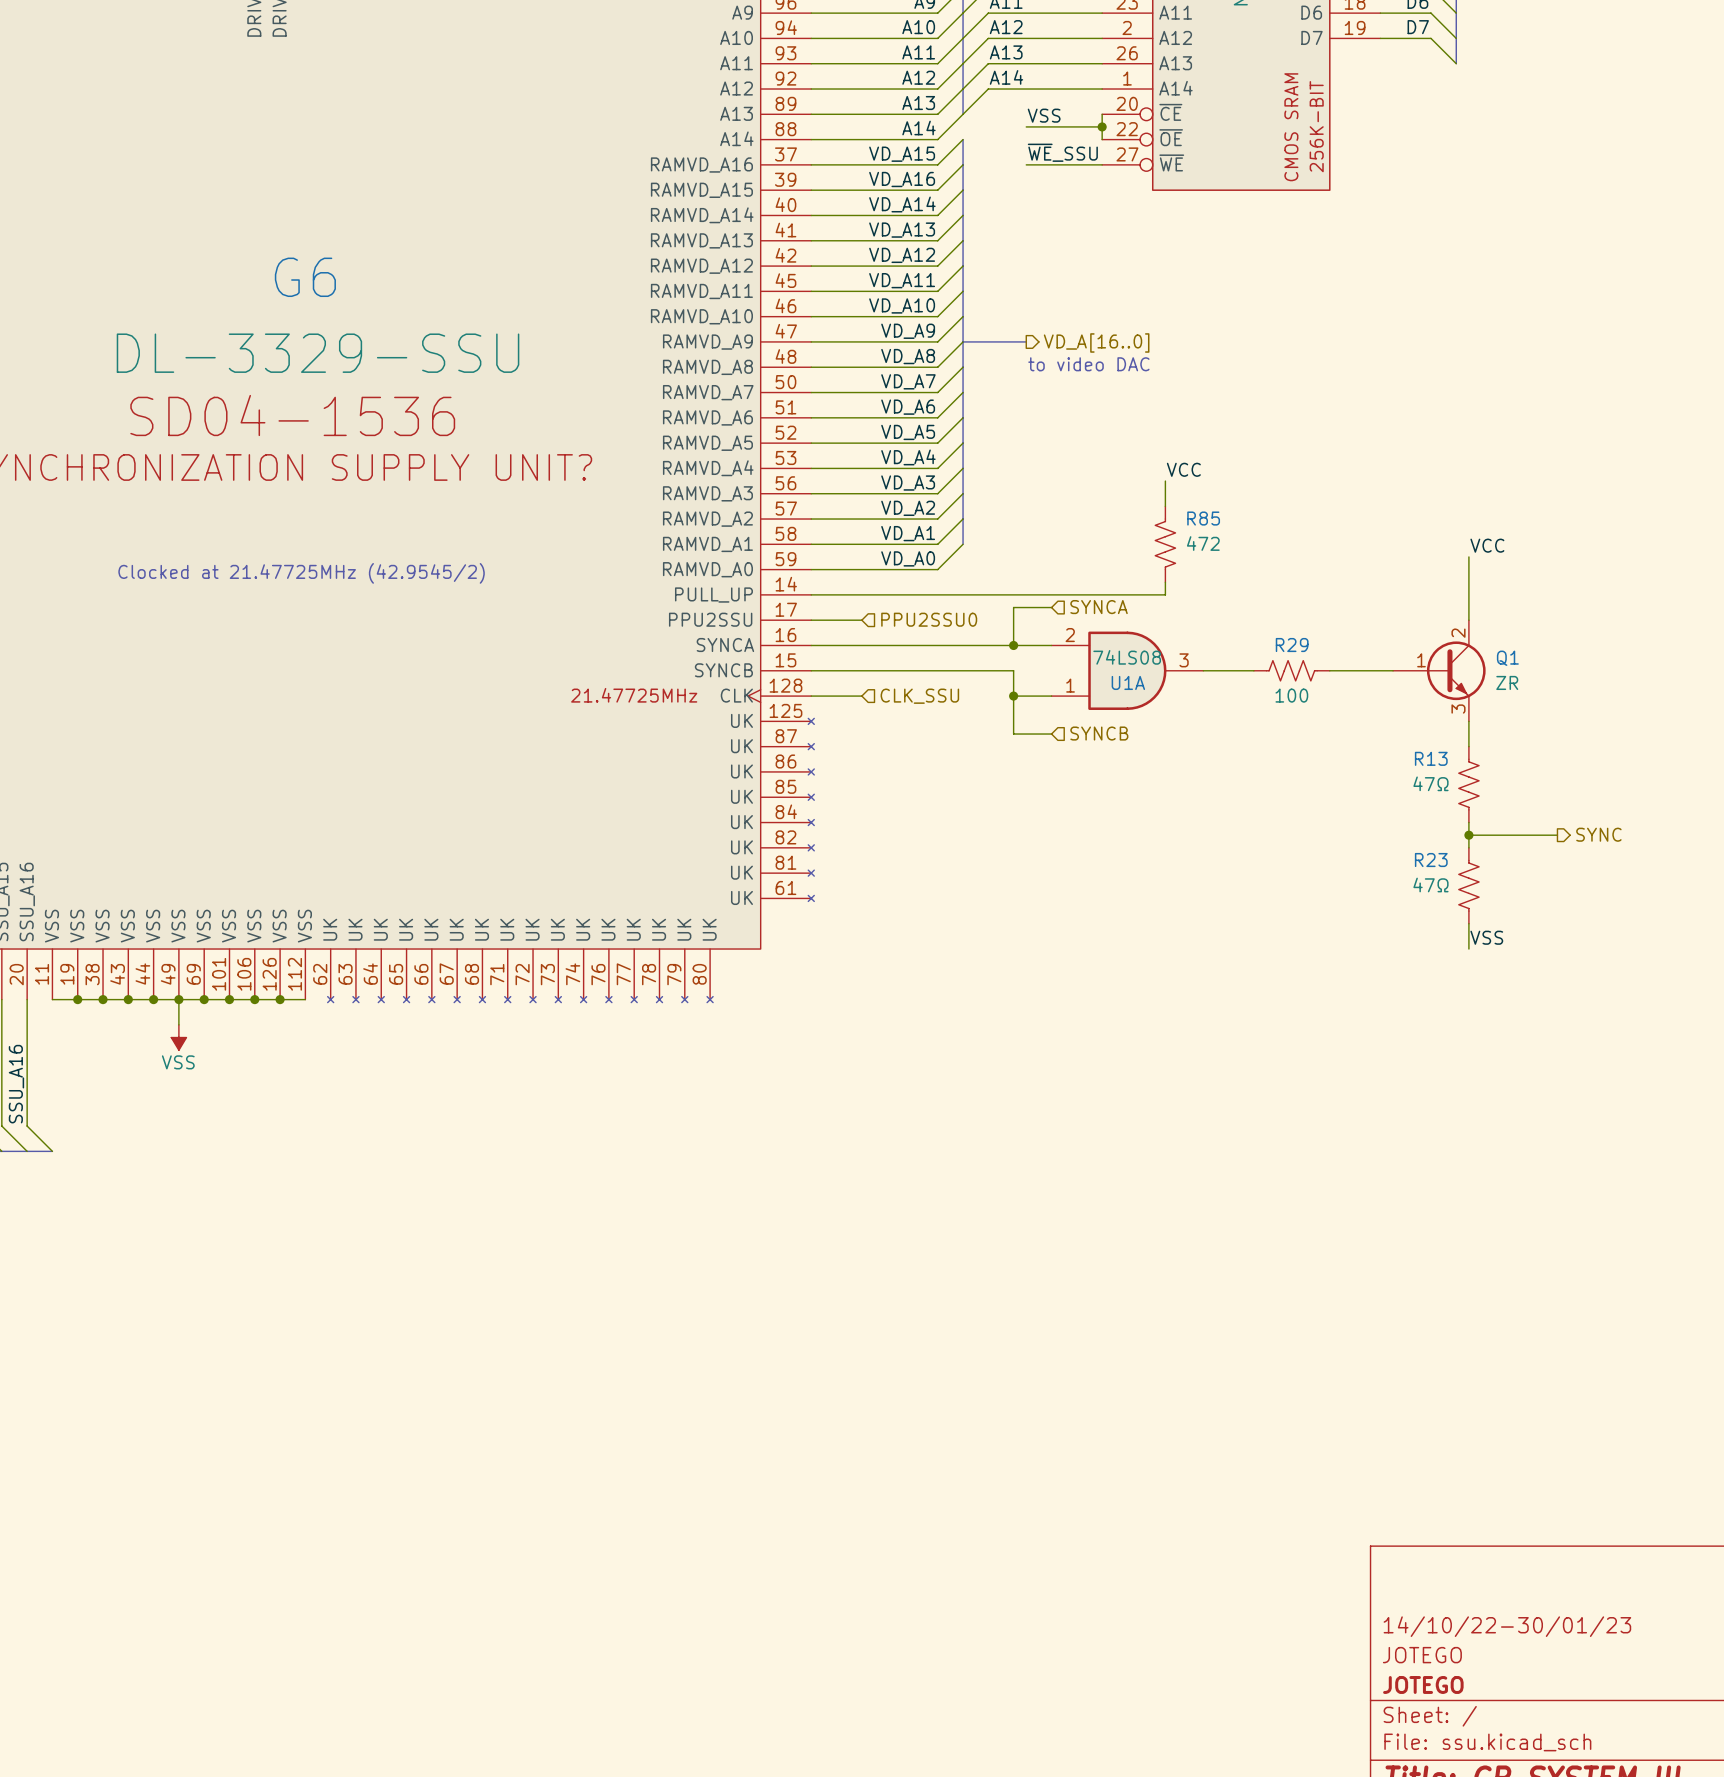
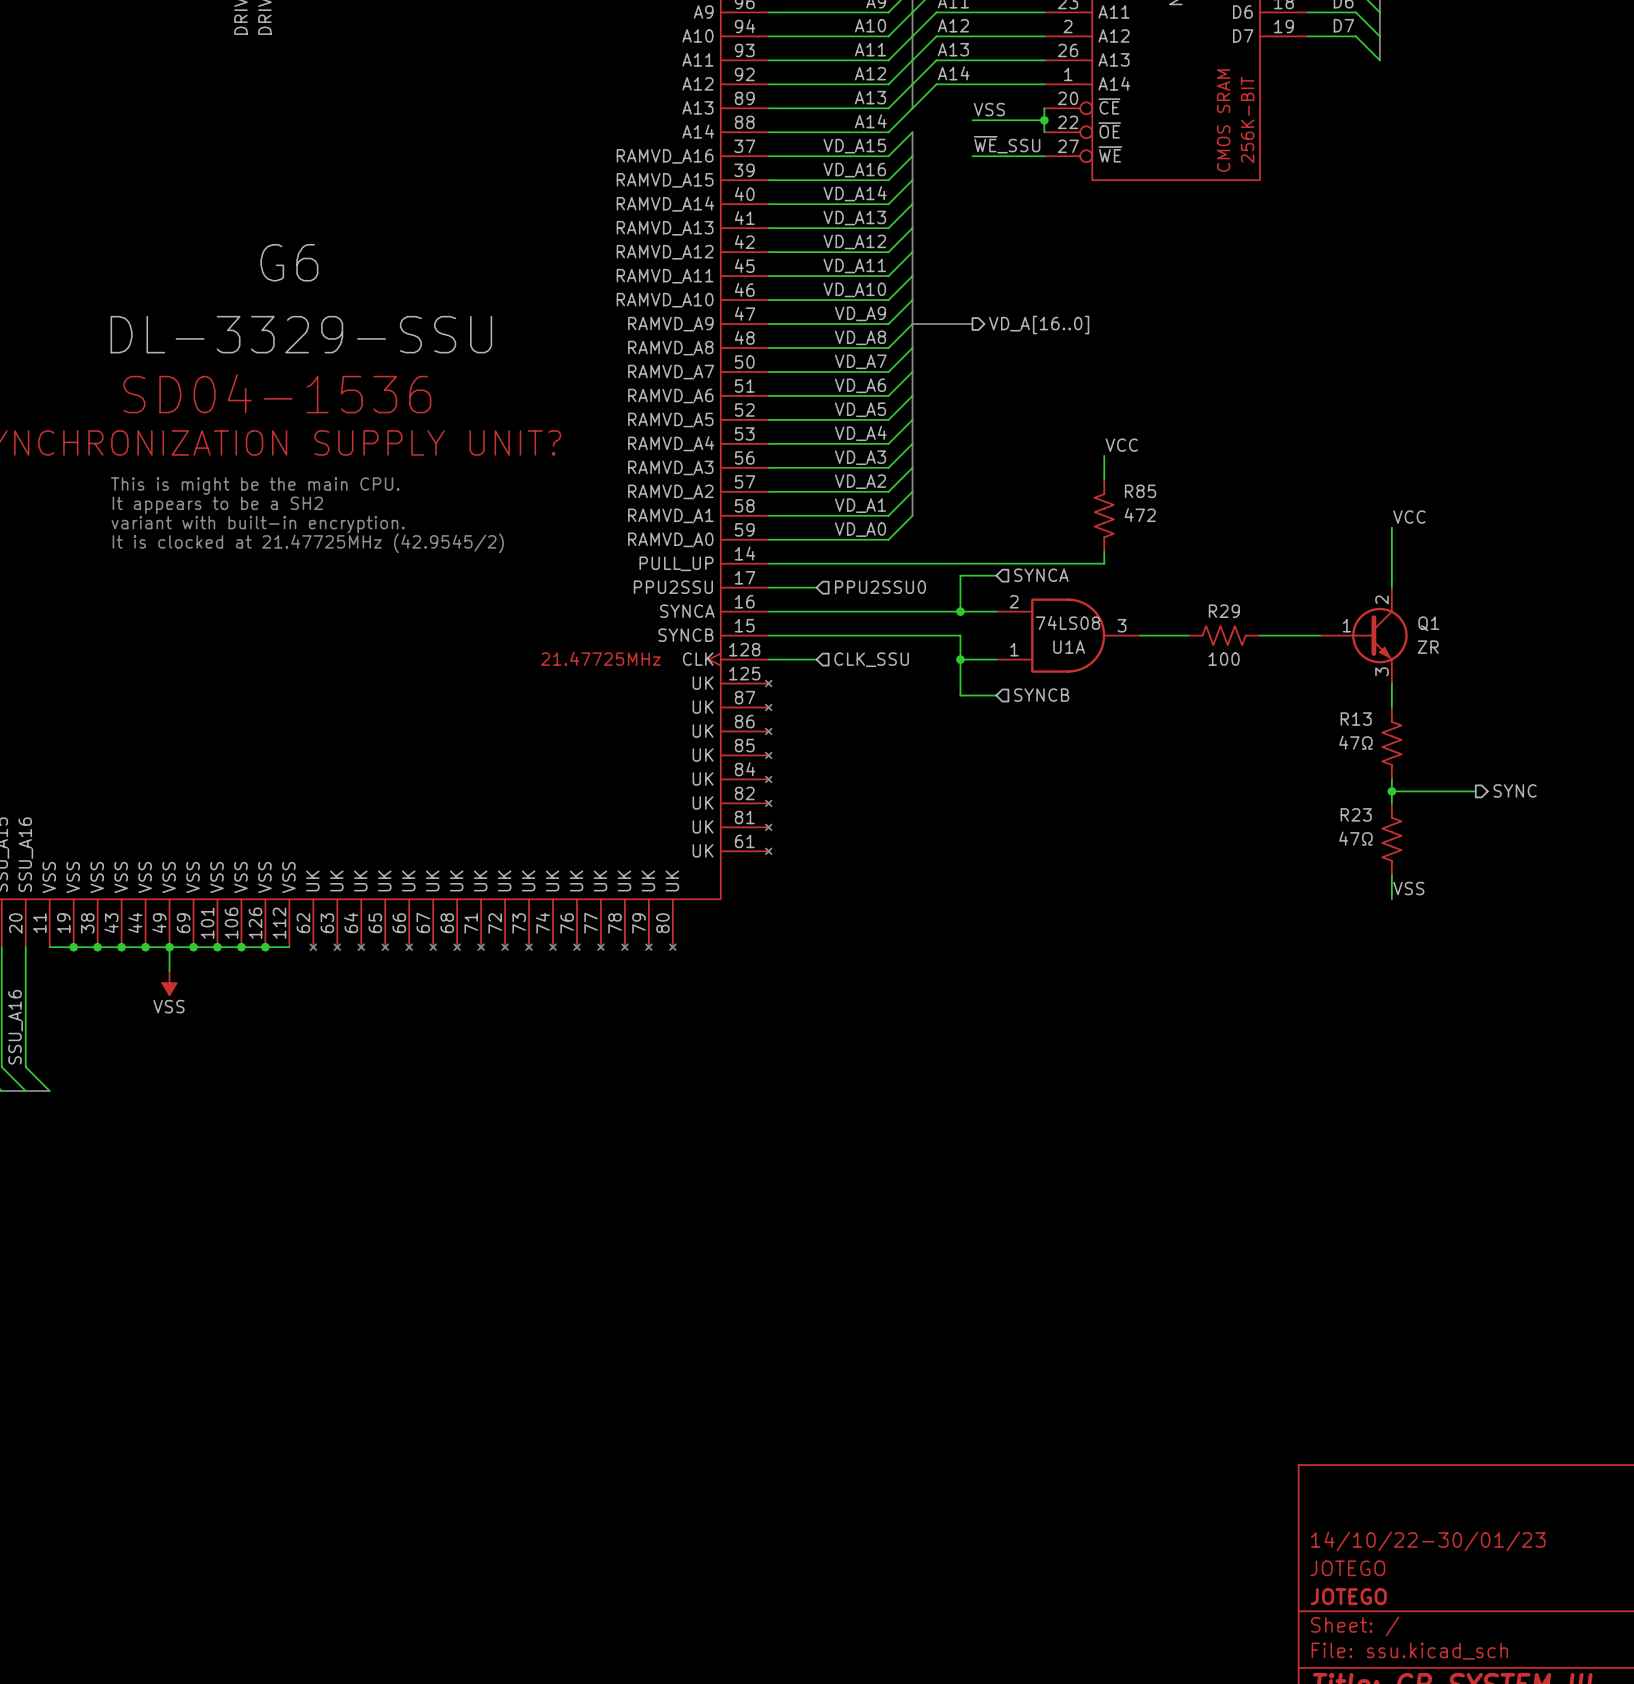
text: to video DAC (1088, 364) -> none
text: none -> This is might be the main CPU. (255, 486)
text: none -> It appears to be a SH2 (217, 505)
text: none -> variant with built-in encryption. (258, 524)
text: Clocked at 21.47725MHz (42.9545/2) (301, 573) -> It is clocked at 21.47725MHz (42.9545/2) (308, 543)

